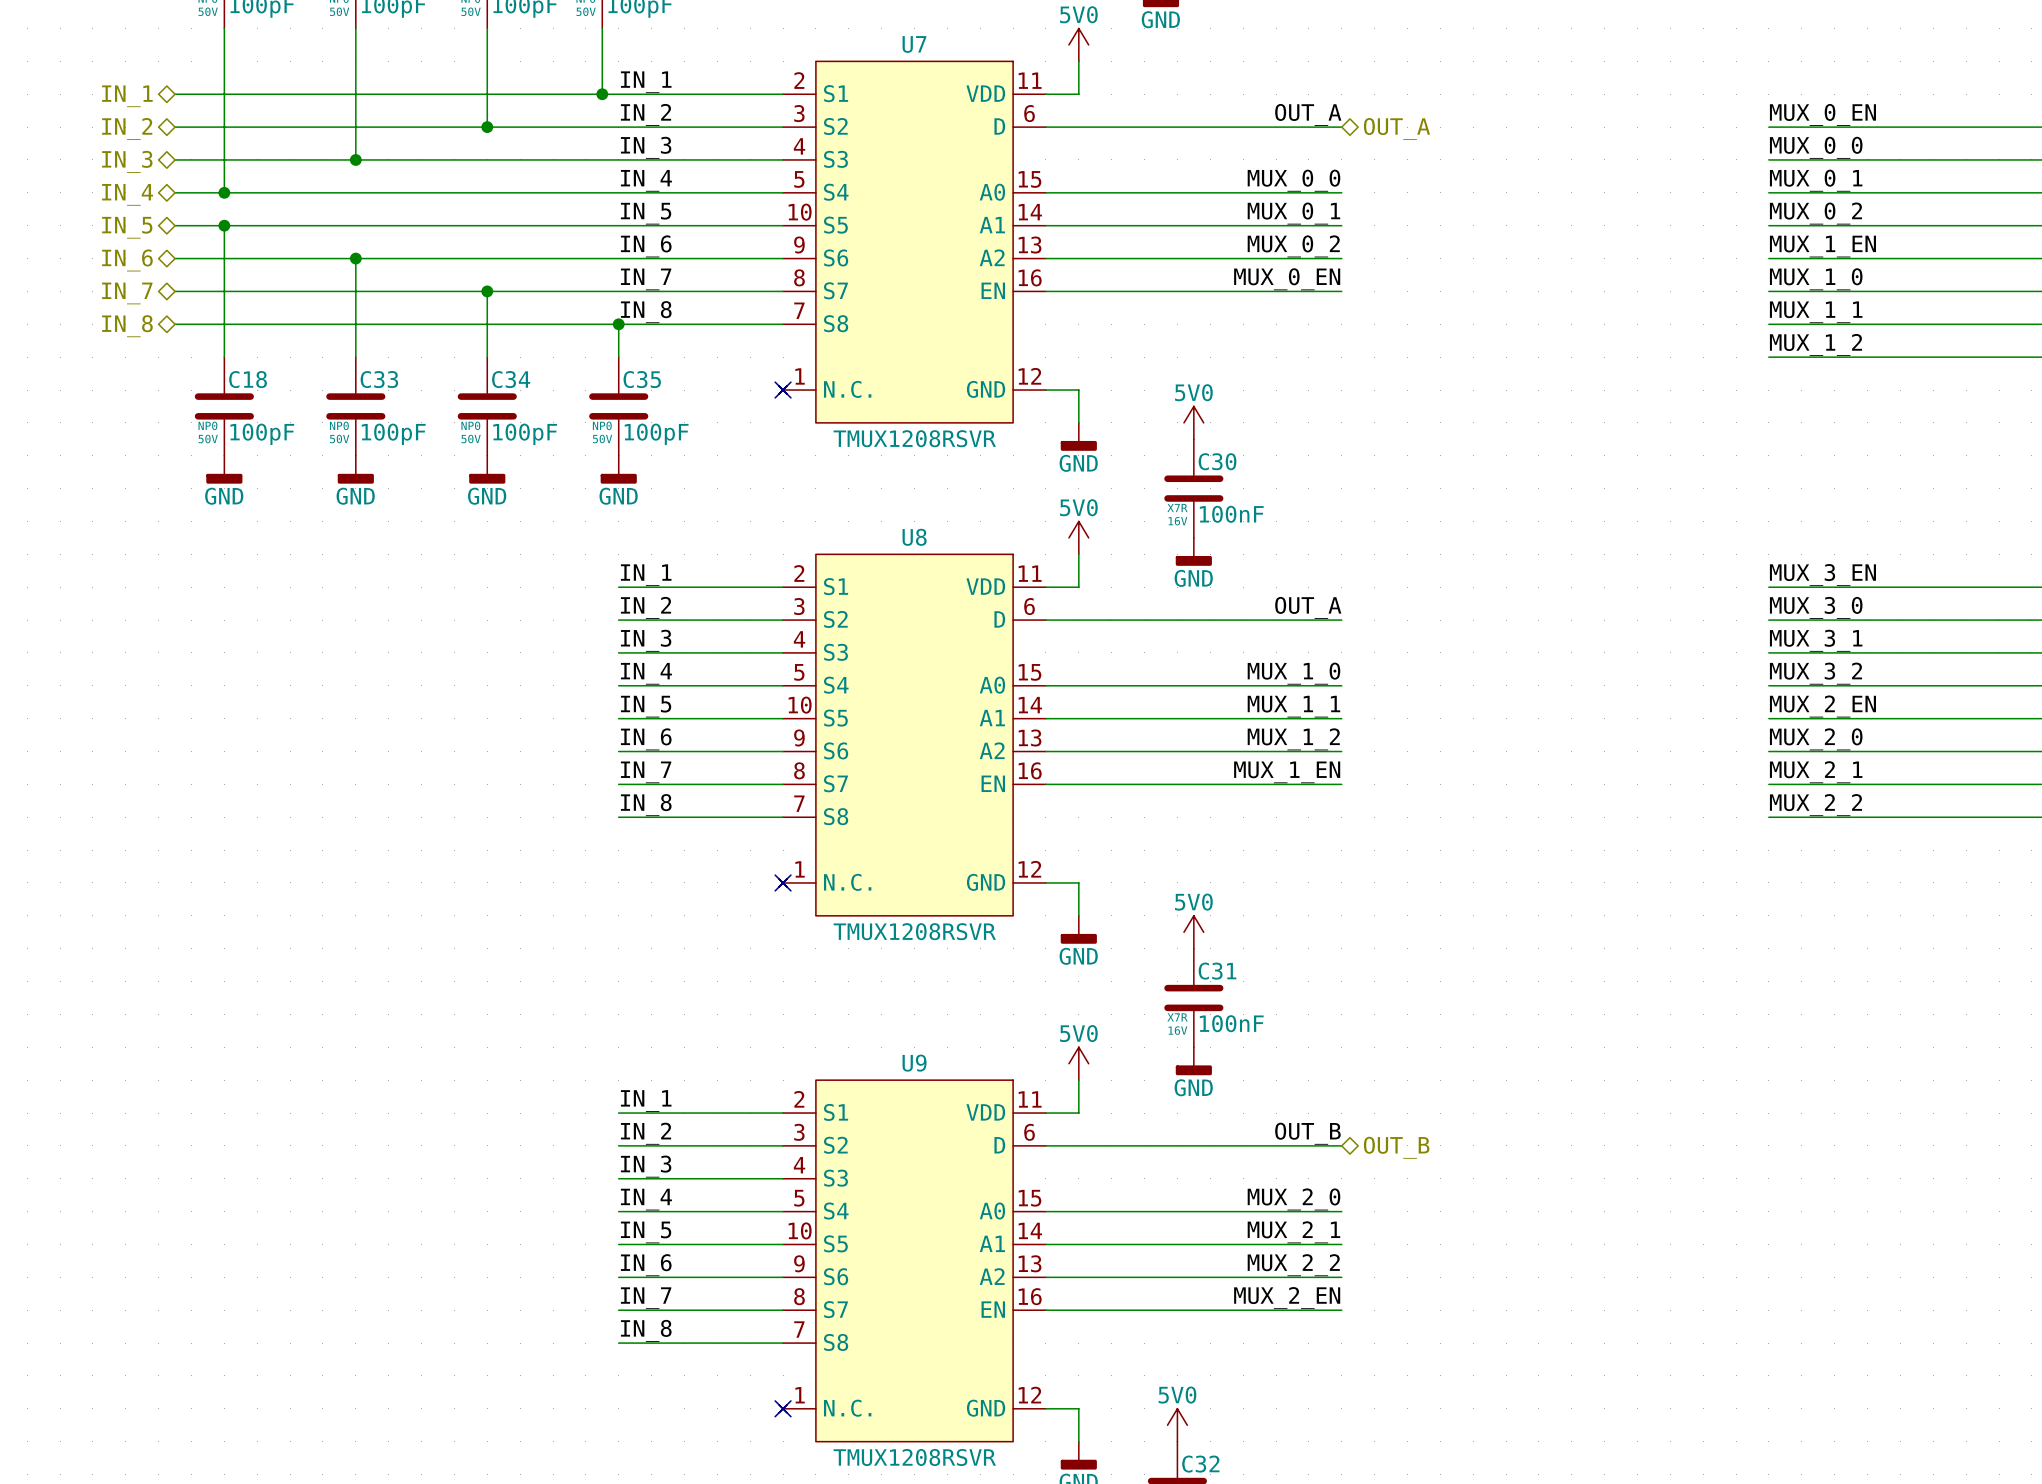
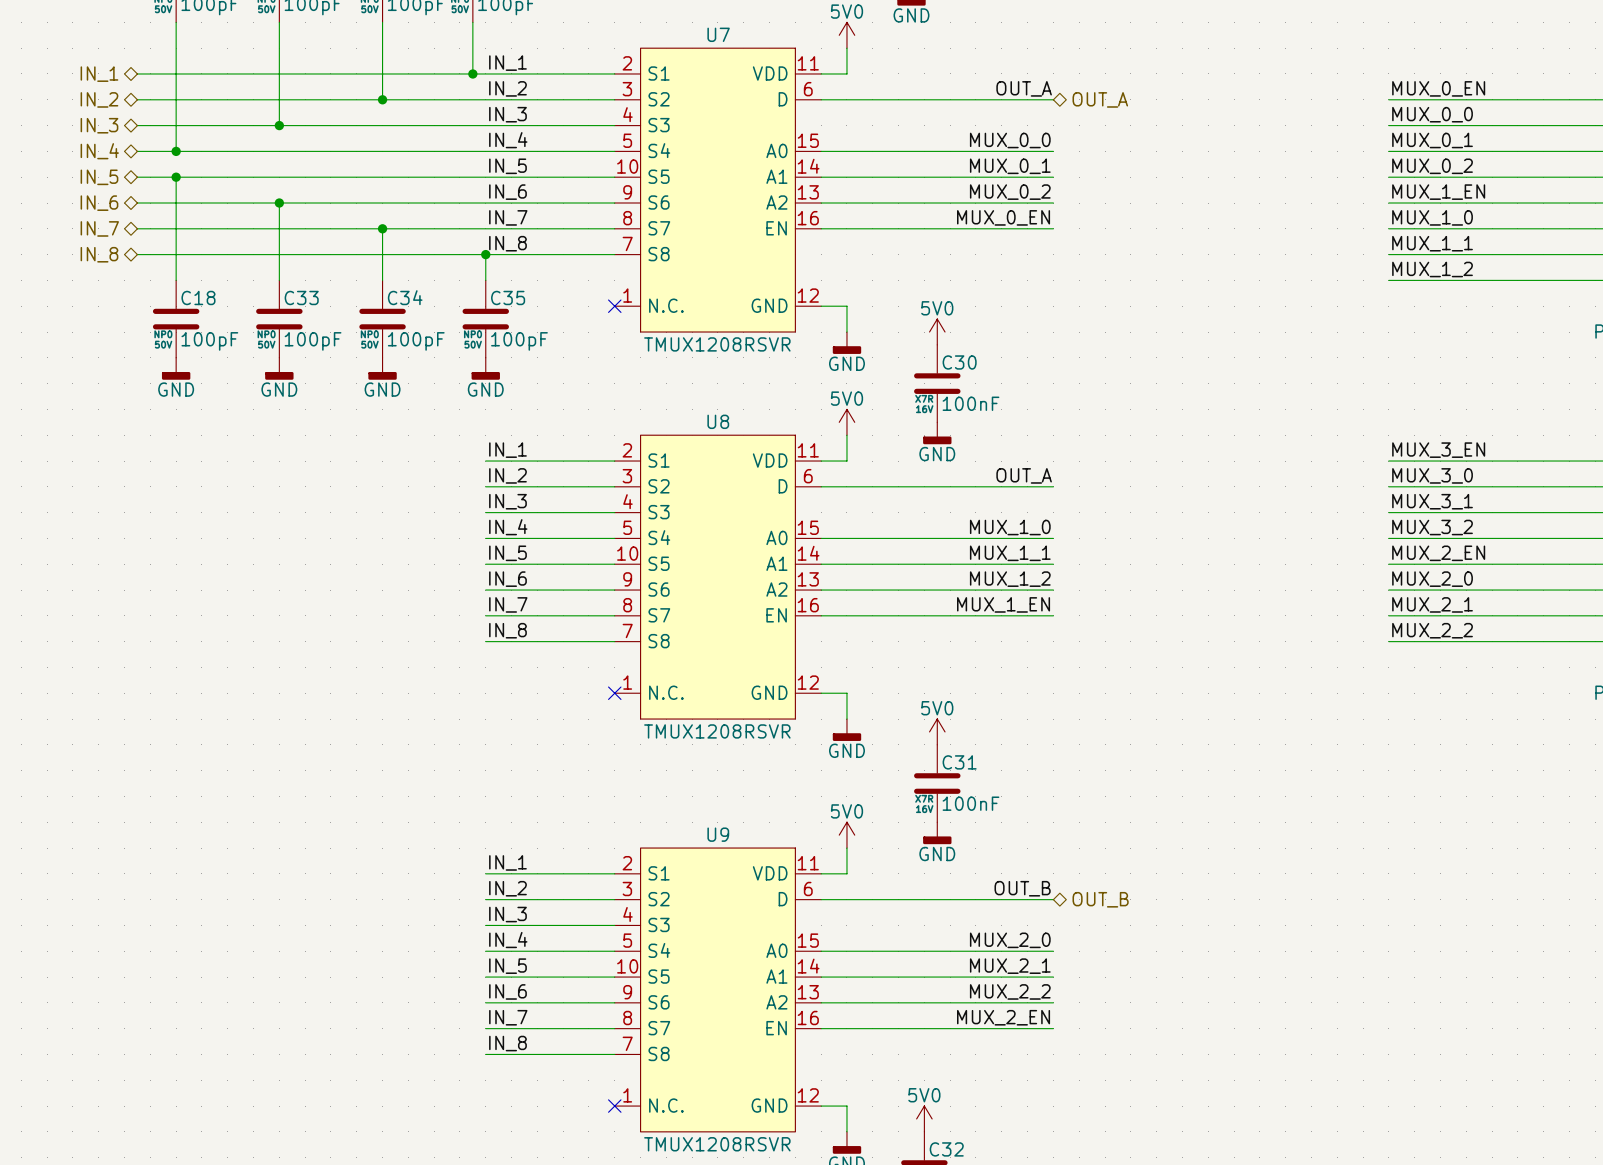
U7 symbol: [779, 61, 1046, 423] -> [614, 48, 822, 333]
U8 symbol: [779, 554, 1046, 916] -> [614, 435, 822, 720]
U9 symbol: [779, 1080, 1046, 1442] -> [614, 848, 822, 1132]

